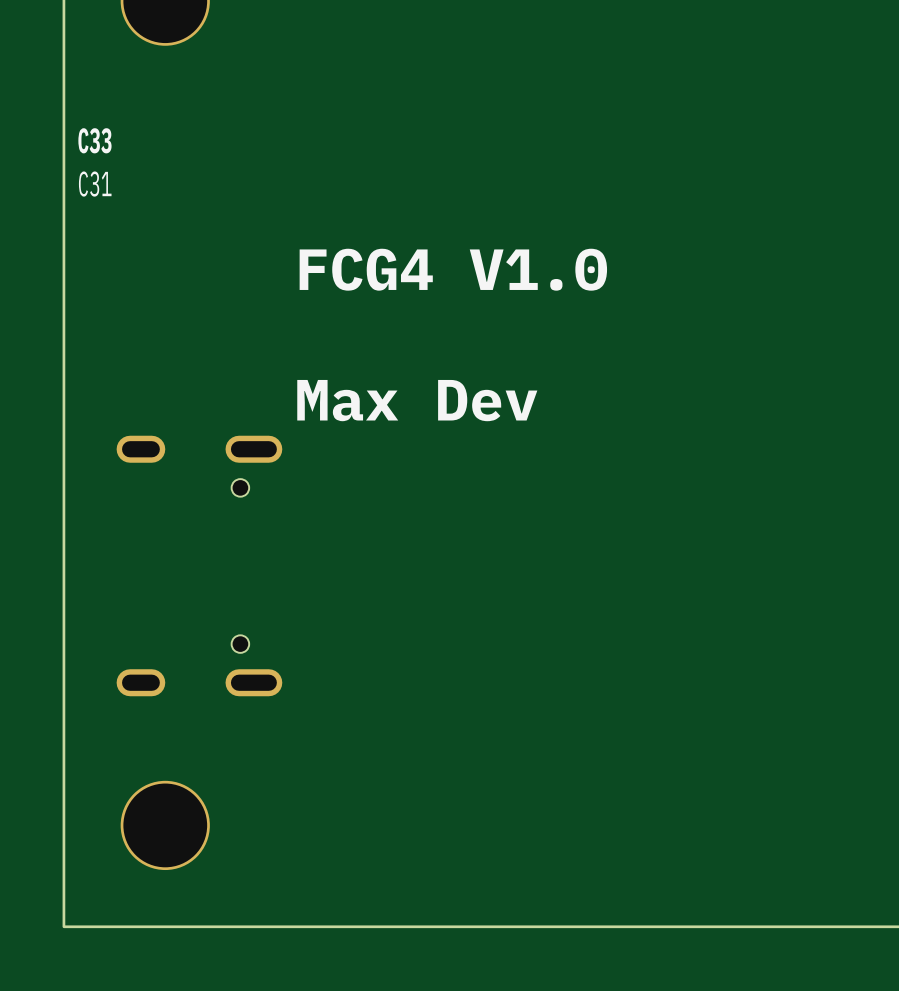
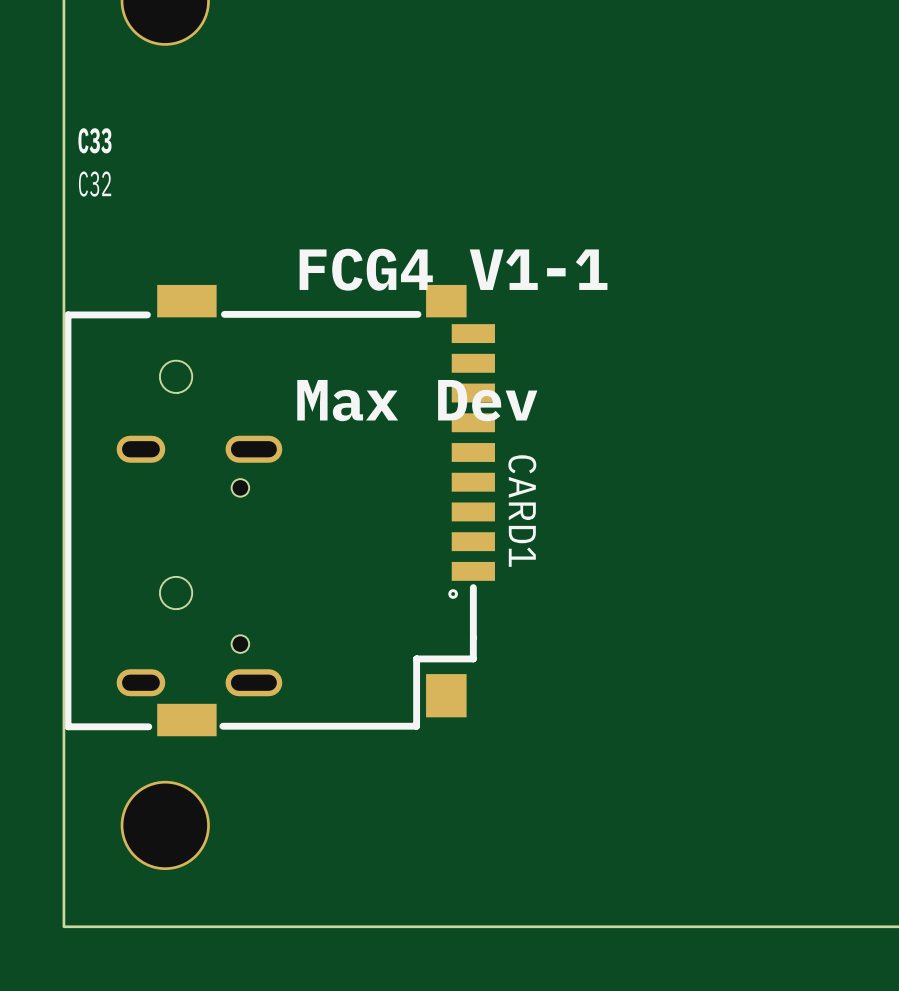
C31 name: C31 (95, 184) -> C32 (95, 184)
text: FCG4 V1.0 (453, 269) -> FCG4 V1-1 (453, 269)
CARD1: none -> (279, 510)

